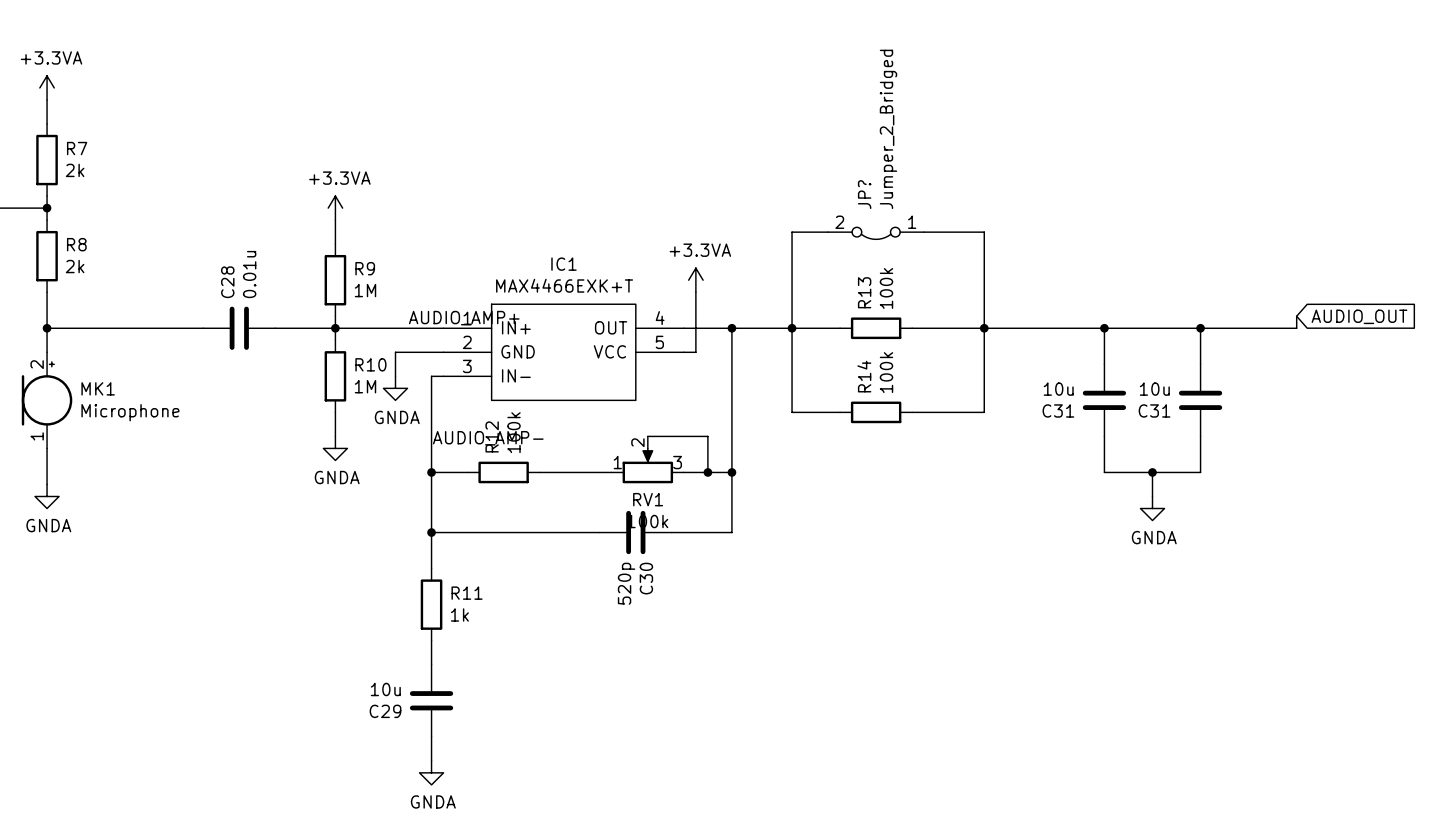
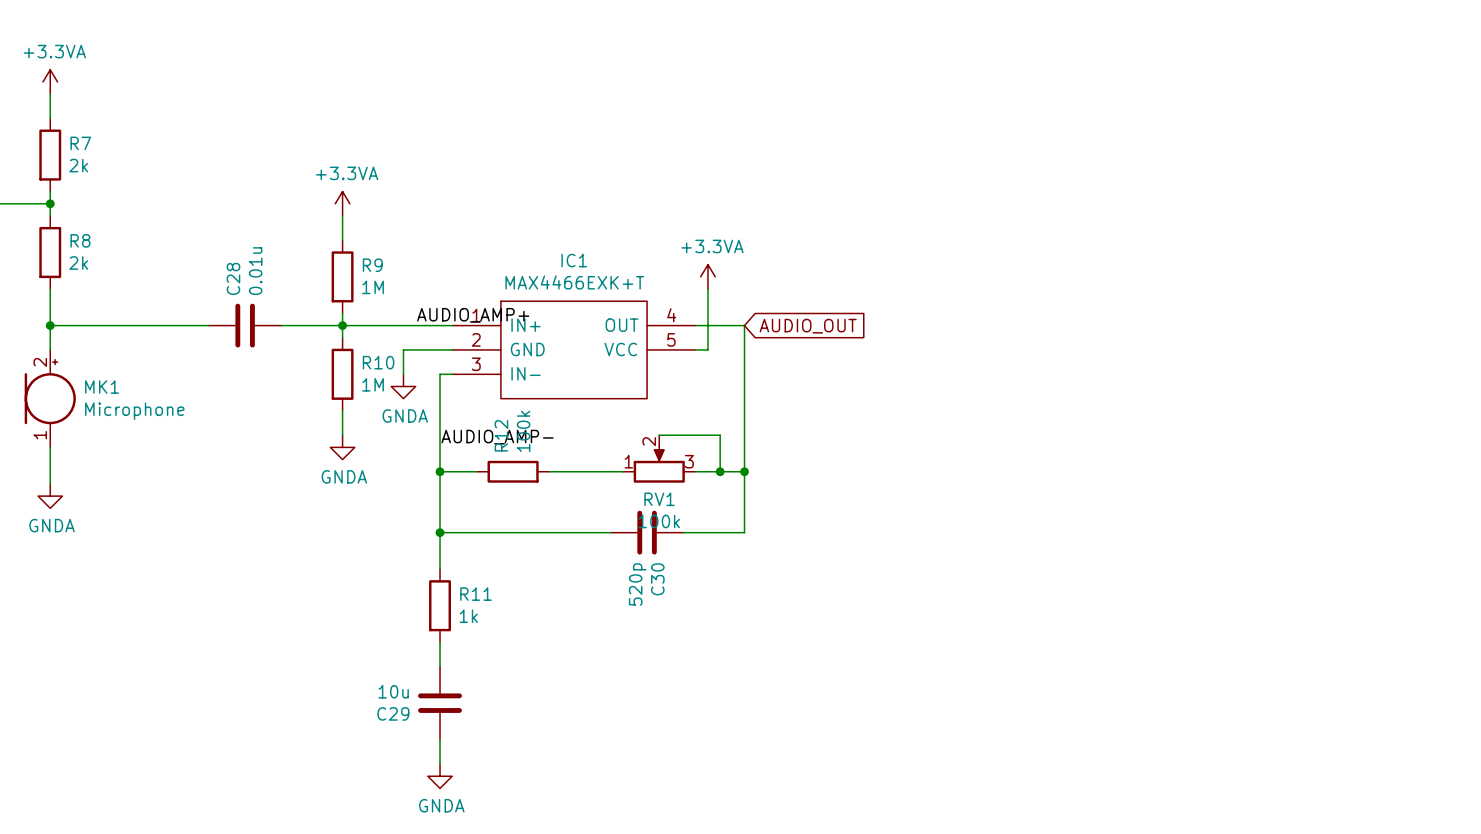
wire: (828, 232) (792, 232) (792, 412) (840, 412) -> none
wire: (924, 232) (984, 232) (984, 412) (912, 412) -> none
JP?: Jumper_2_Bridged (876, 233) -> none
wire: (1296, 316) (1296, 328) (912, 328) -> none
global label: AUDIO_OUT (1359, 316) -> none
wire: (731, 328) (840, 328) -> none
junction: (731, 328) -> none
junction: (792, 328) -> none
global label: none -> AUDIO_OUT (808, 326)
R13: 100k (876, 328) -> none
junction: (984, 328) -> none
wire: (1104, 328) (1104, 364) -> none
junction: (1104, 328) -> none
wire: (1200, 328) (1200, 364) -> none
junction: (1200, 328) -> none
C31: 10u (1104, 400) -> none
C31: 10u (1200, 400) -> none
R14: 100k (876, 412) -> none
wire: (1104, 436) (1104, 472) (1200, 472) (1200, 436) -> none
wire: (1152, 472) (1152, 496) -> none
junction: (1152, 472) -> none
power symbol: GNDA (1152, 508) -> none

